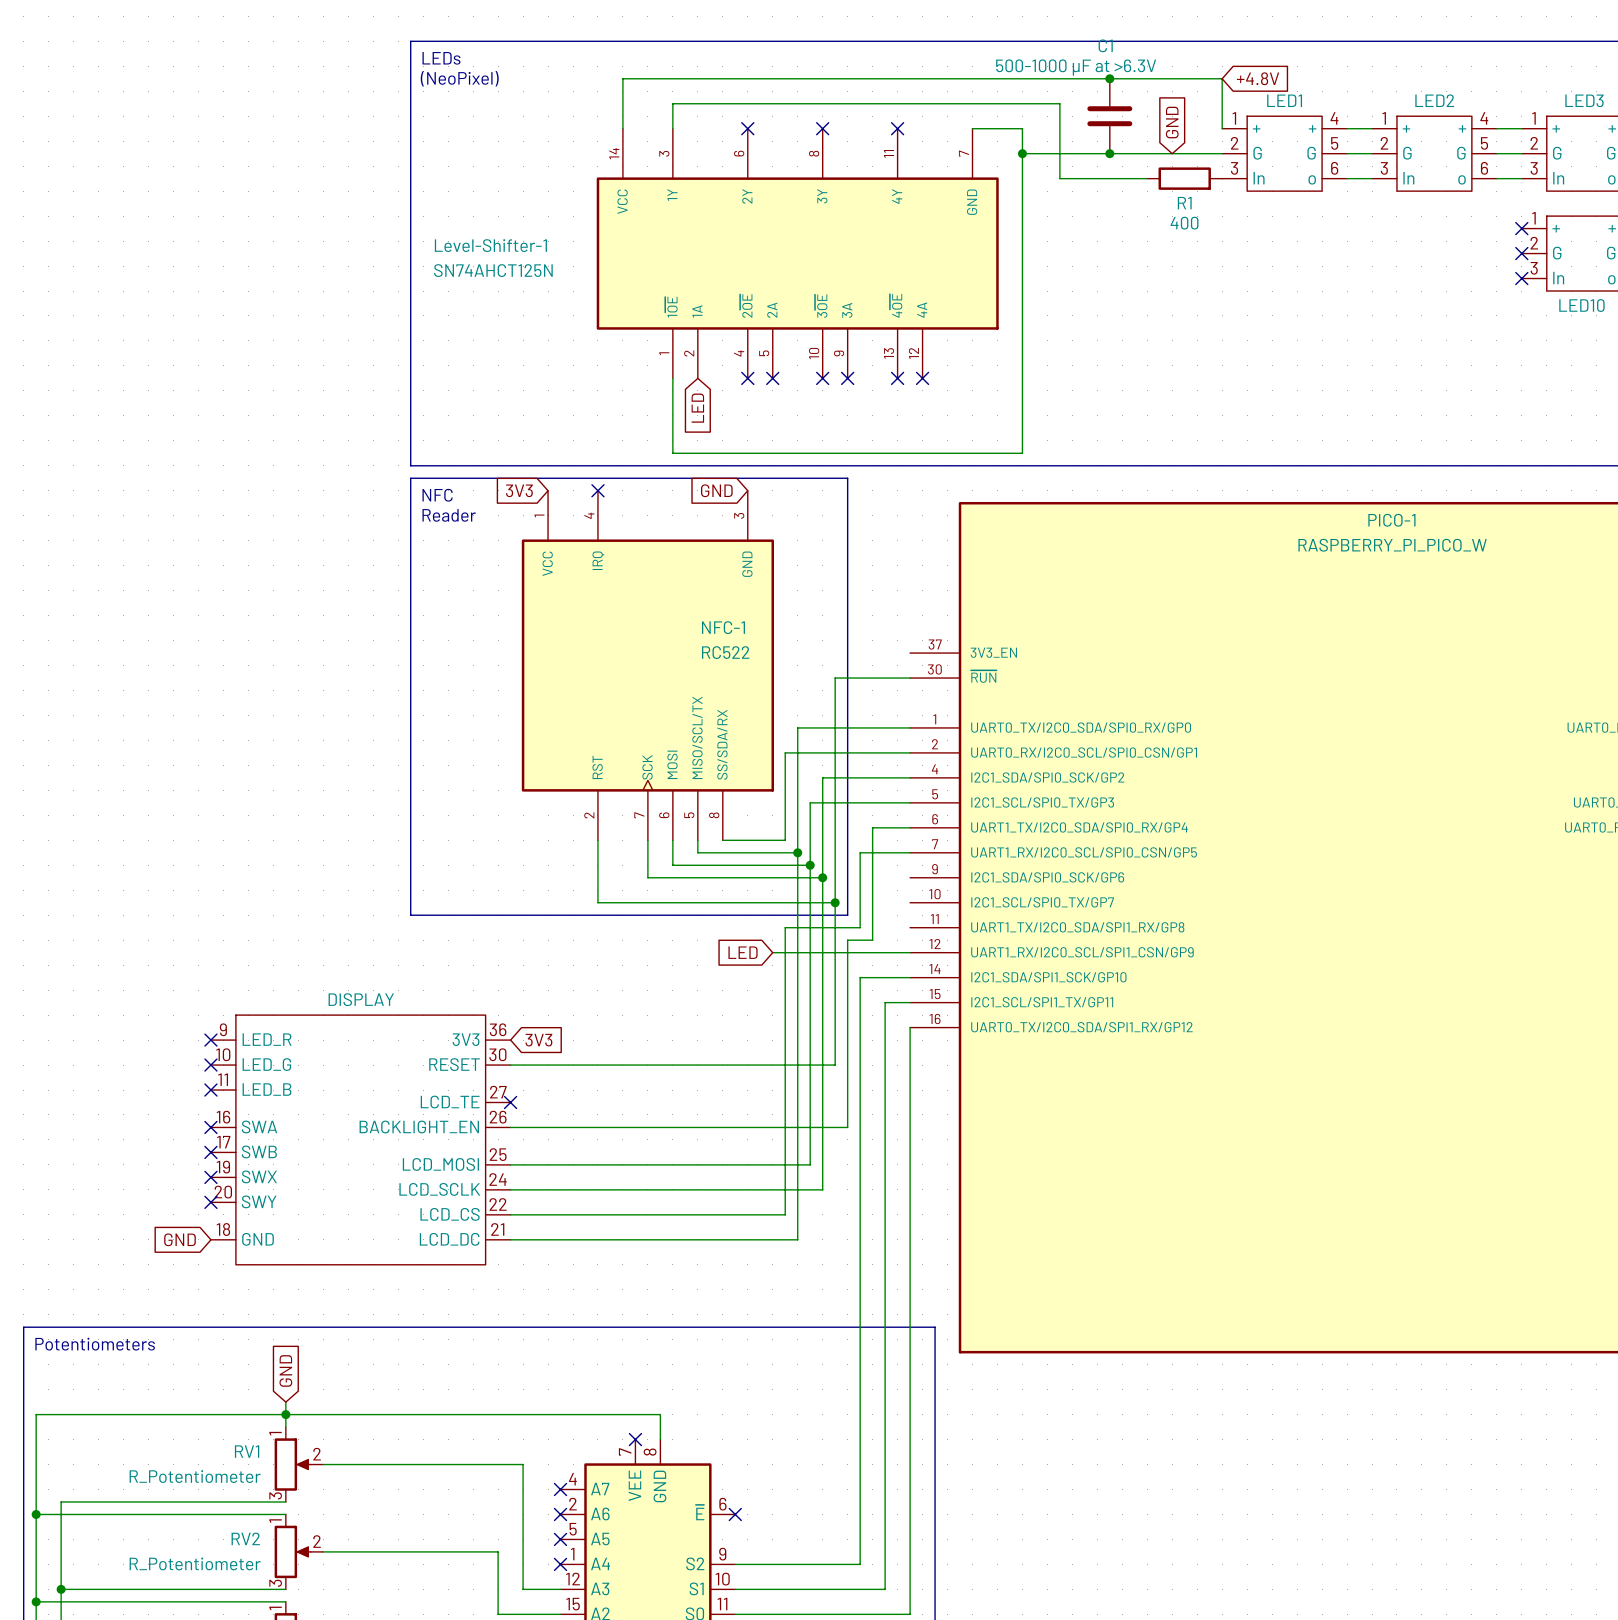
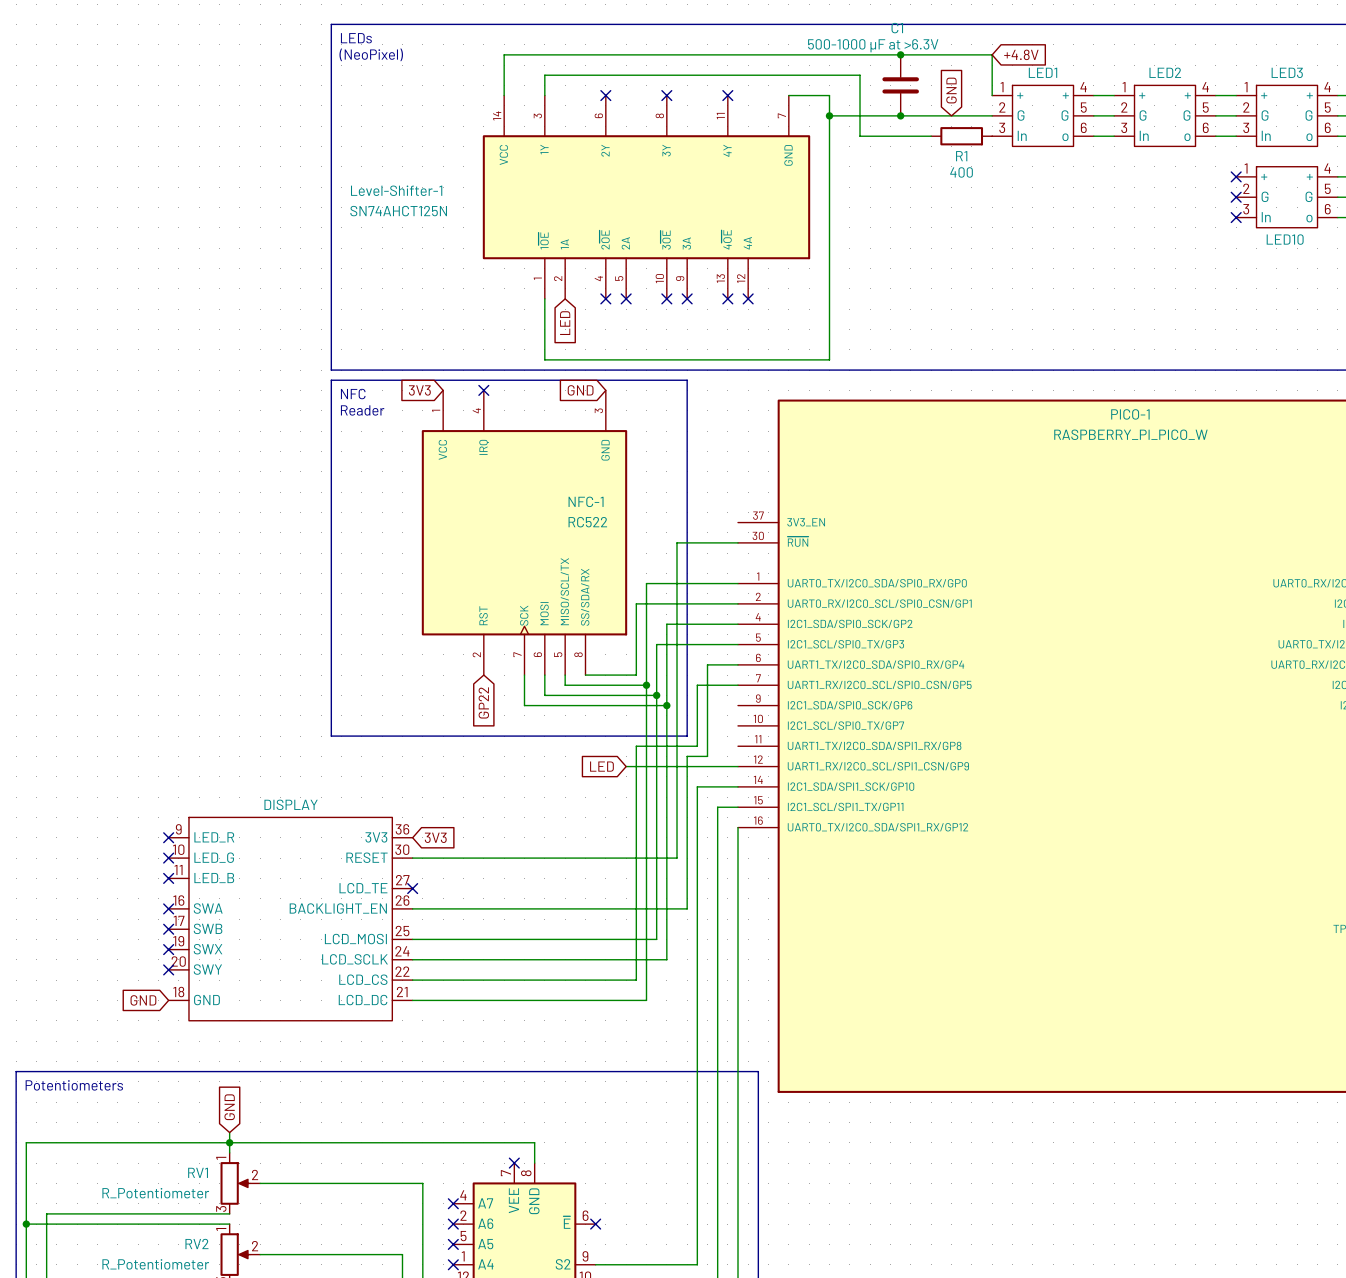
wire: (597, 840) (597, 902) (835, 902) -> none
global label: none -> GP22 (483, 702)
junction: (835, 902) -> none

